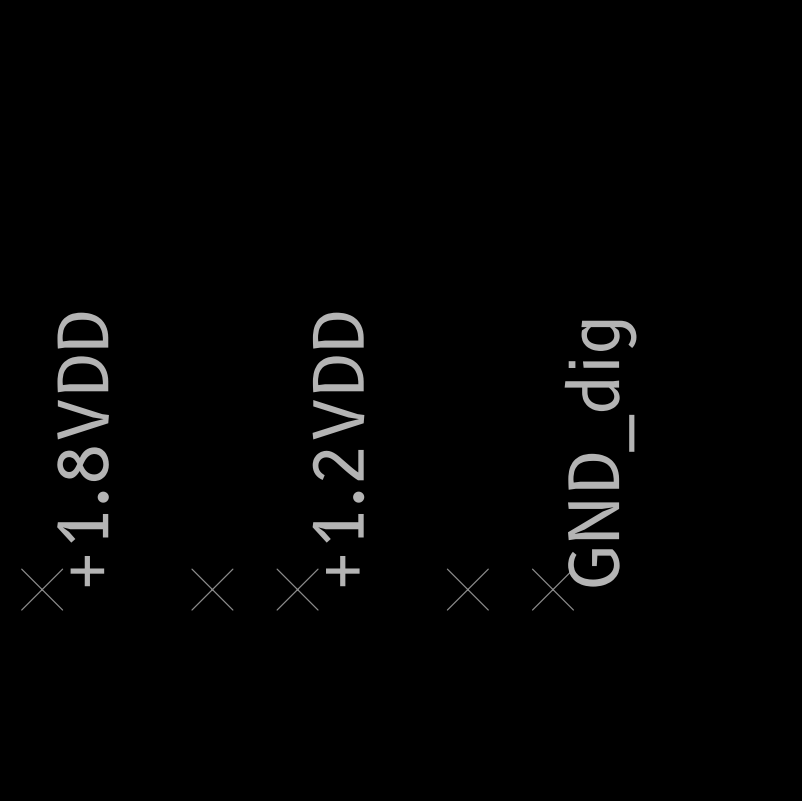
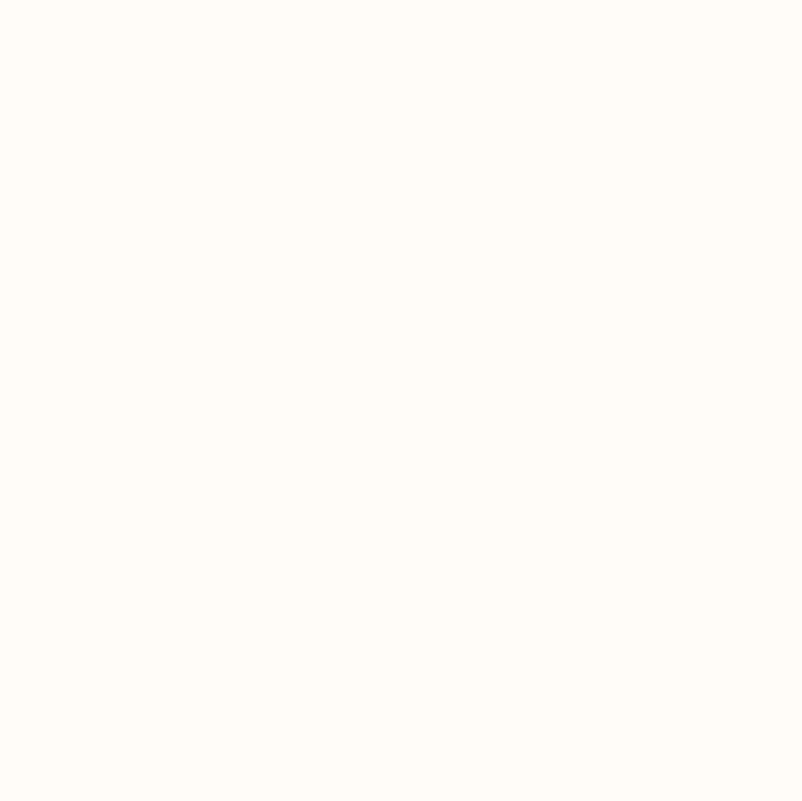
label: +1.8VDD (83, 449) -> none
label: +1.2VDD (338, 449) -> none
label: GND_dig (600, 453) -> none
no-connect mark: (42, 589) -> none
no-connect mark: (212, 589) -> none
no-connect mark: (297, 589) -> none
no-connect mark: (467, 589) -> none
no-connect mark: (552, 589) -> none

